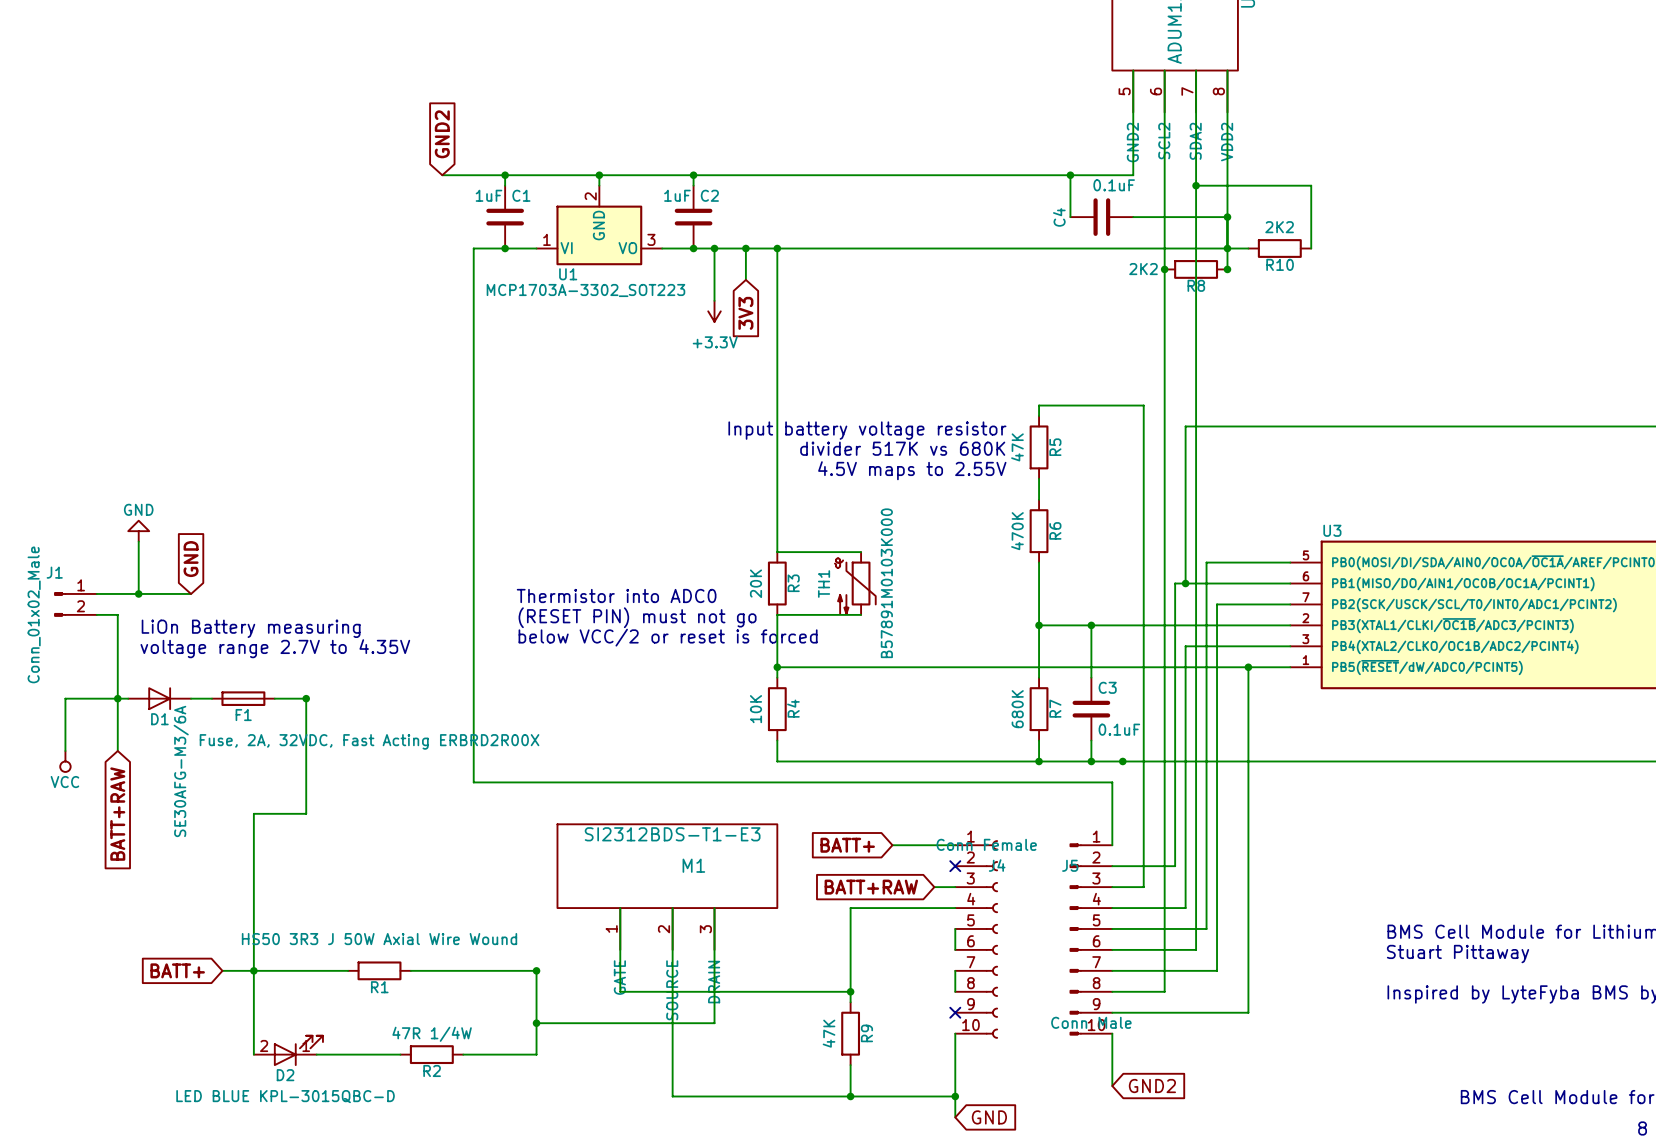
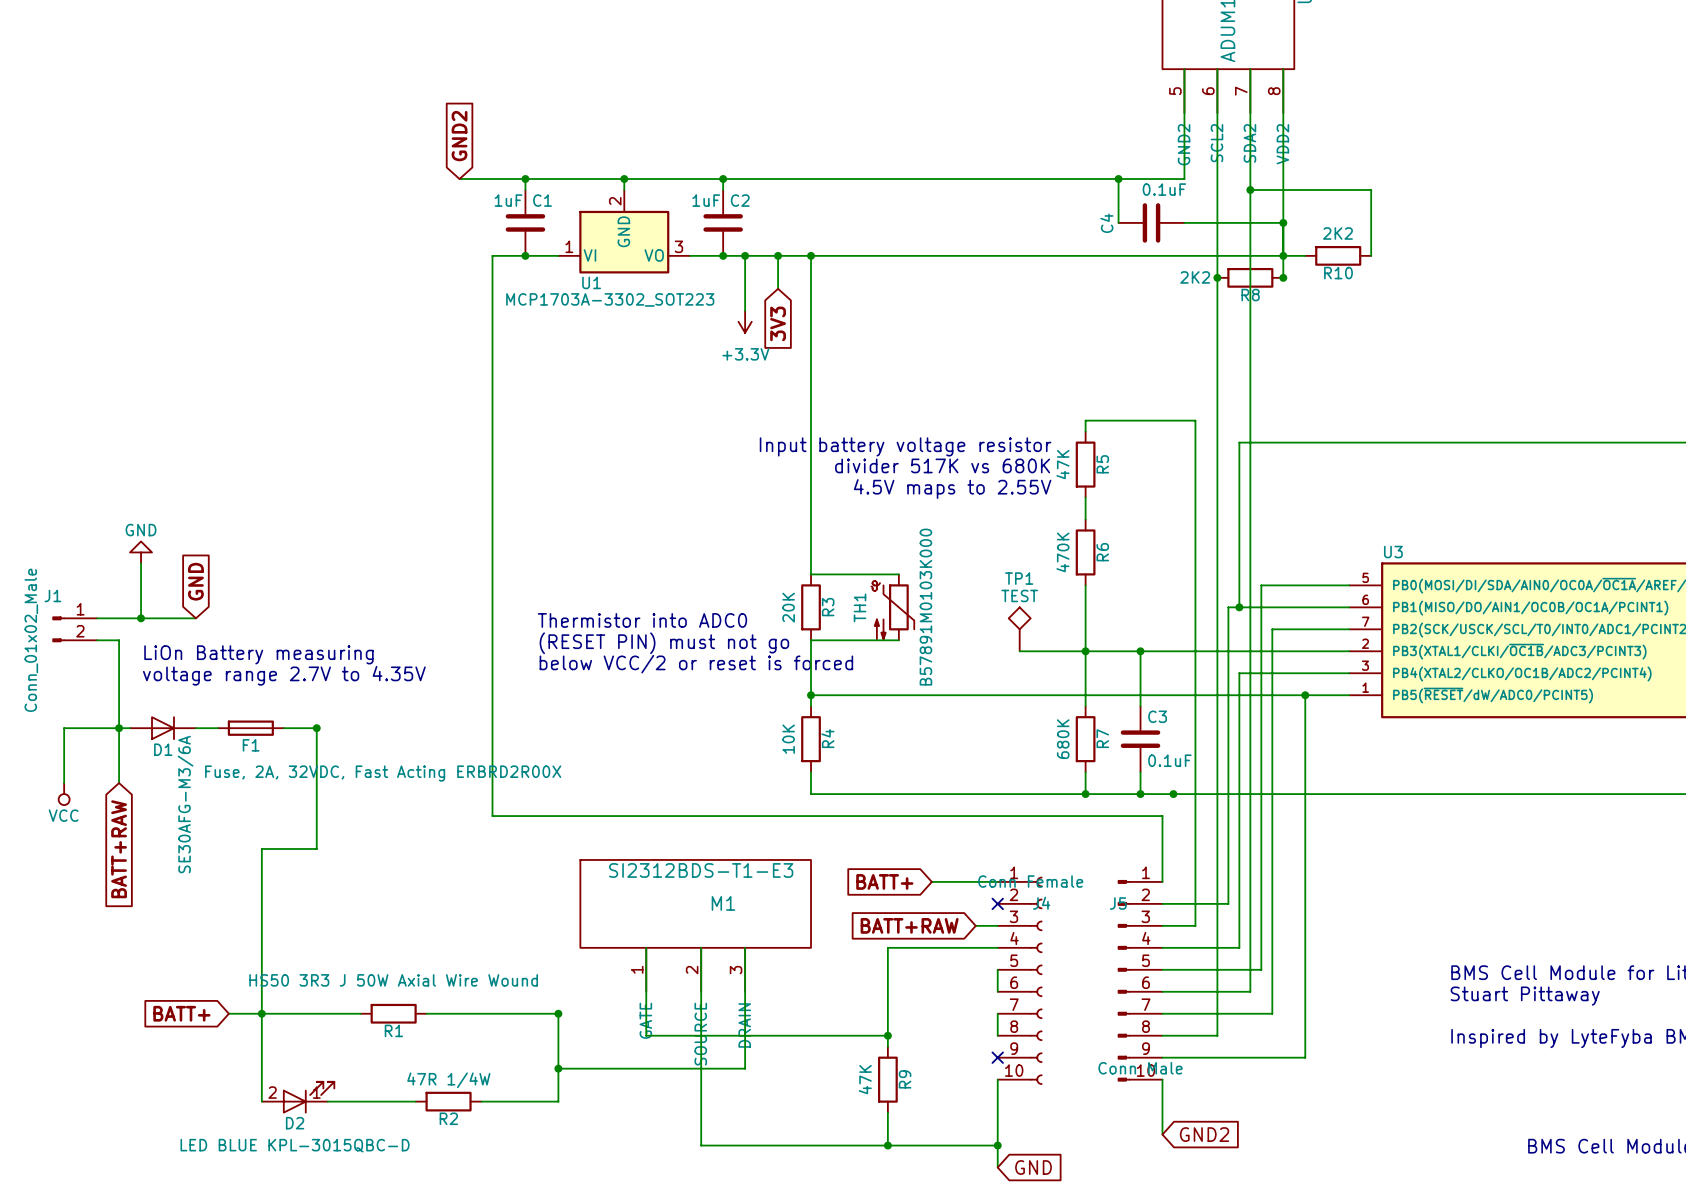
TP1: none -> TEST (1019, 629)
wire: none -> (1019, 651) (1085, 651)

